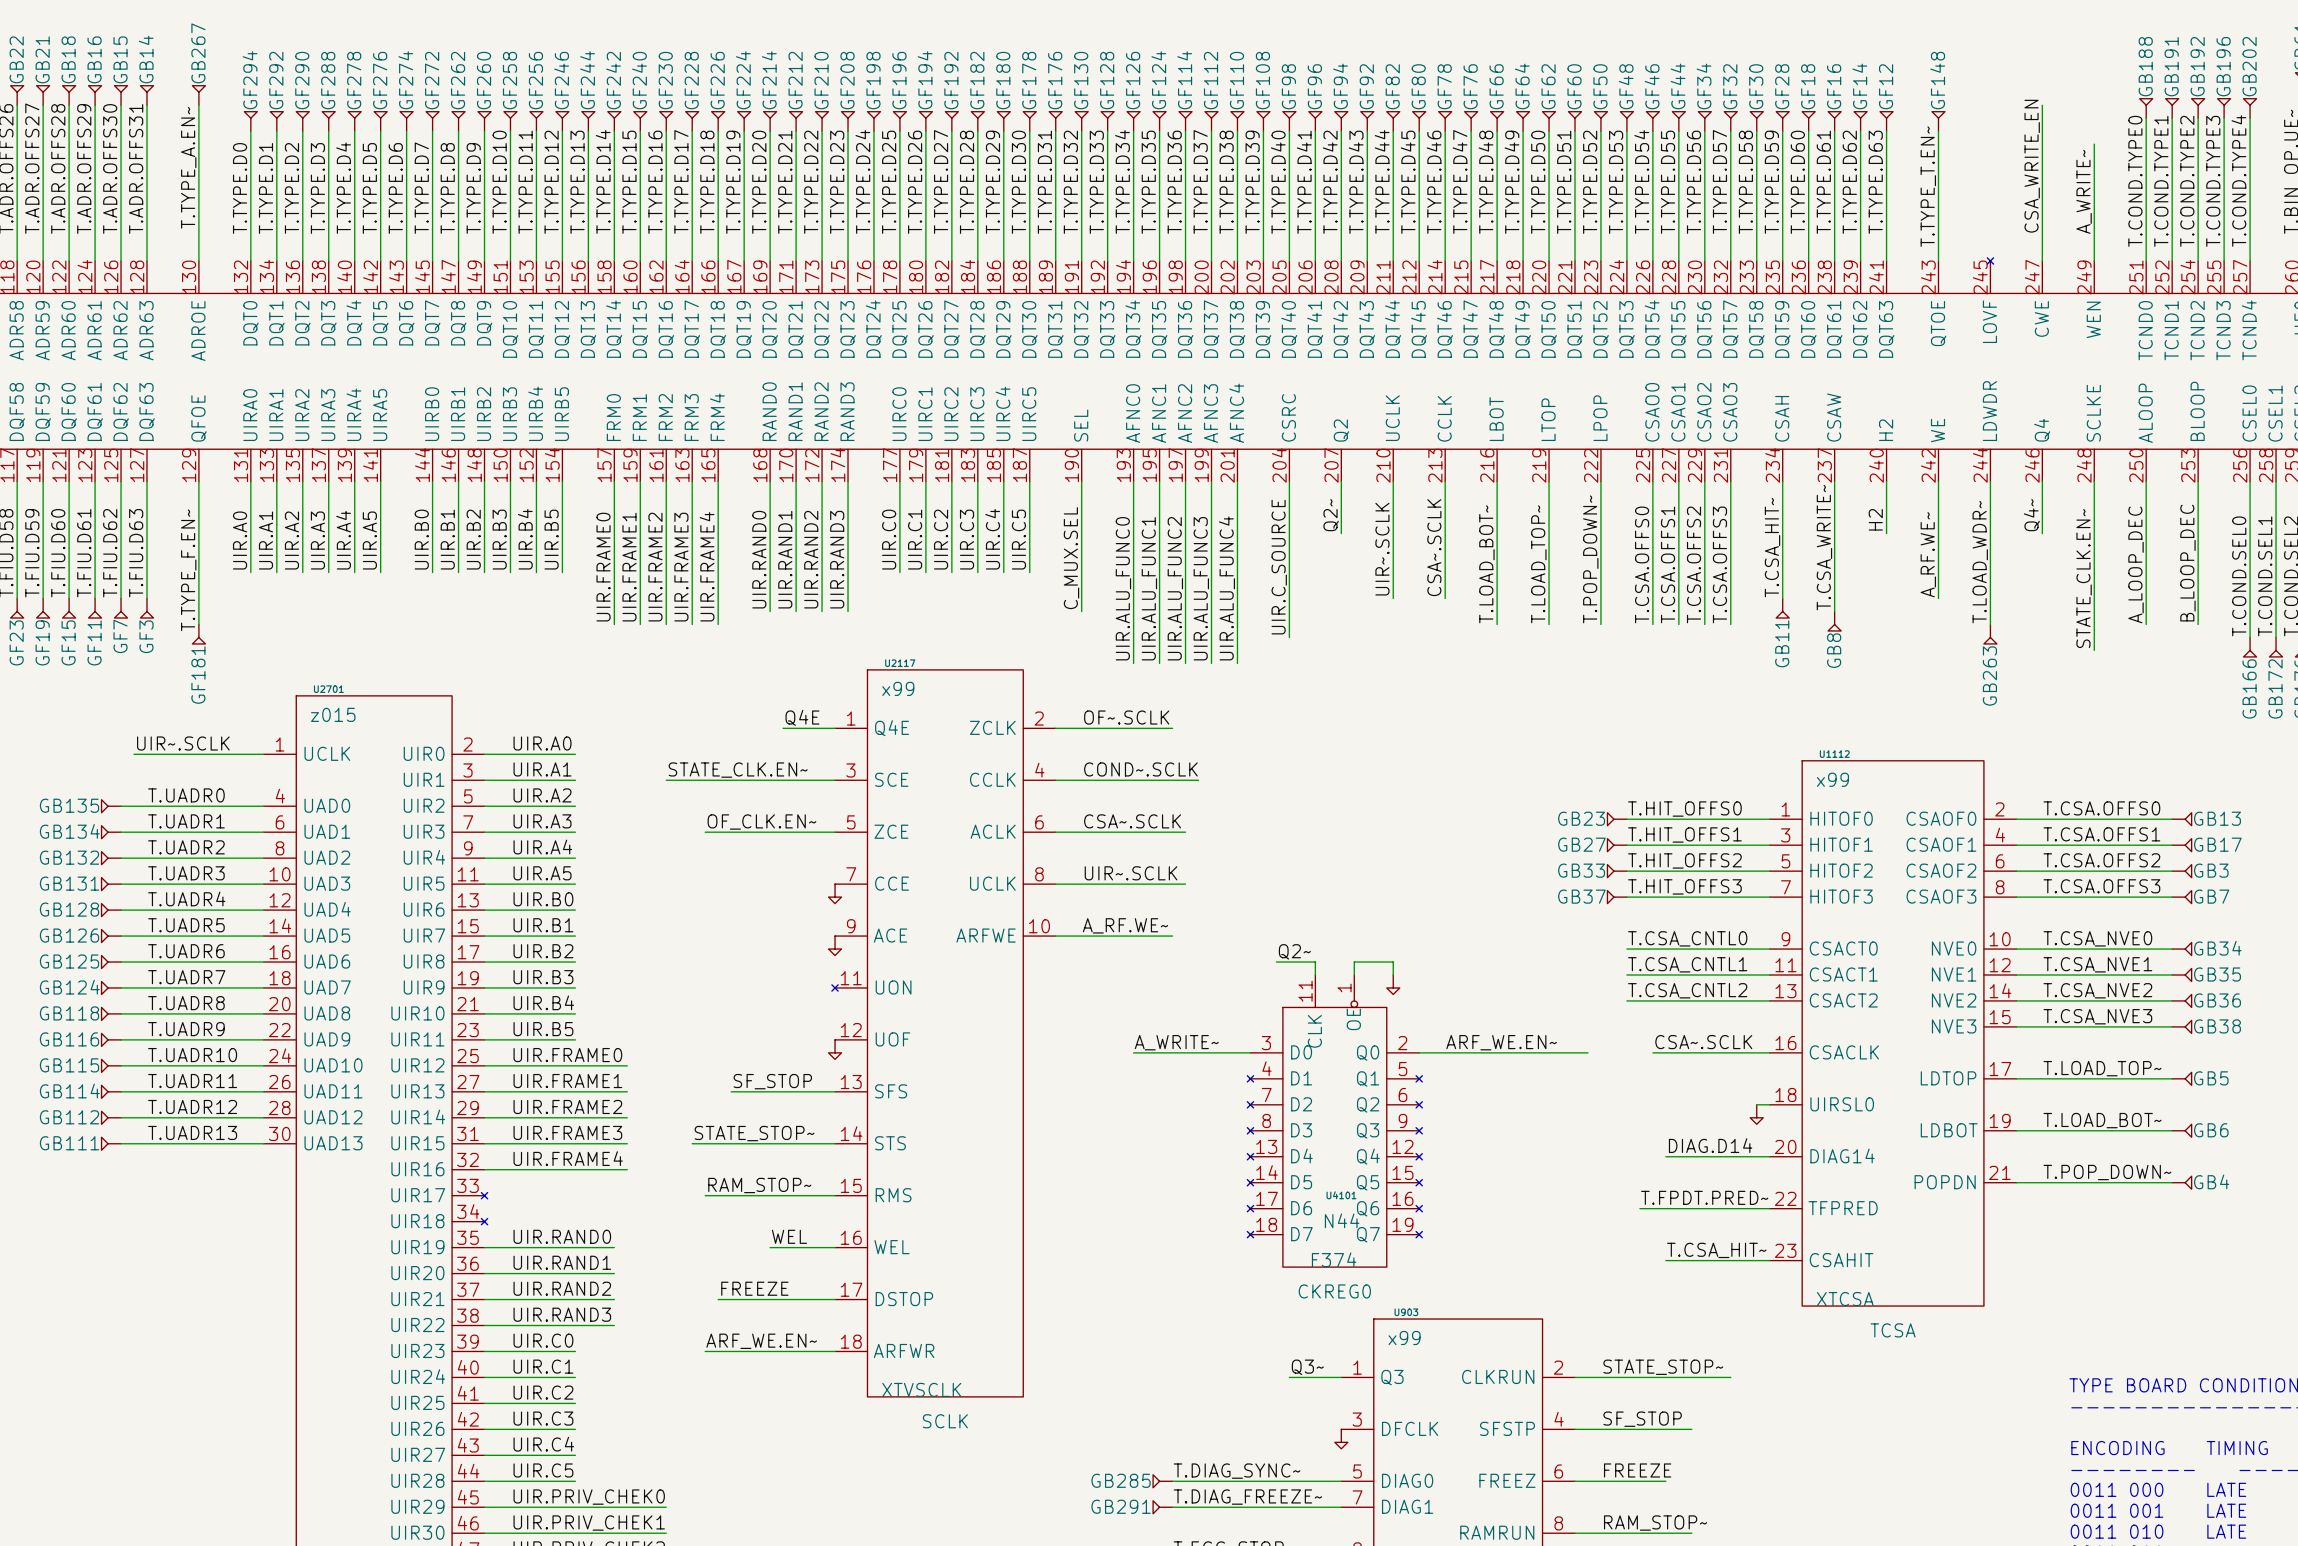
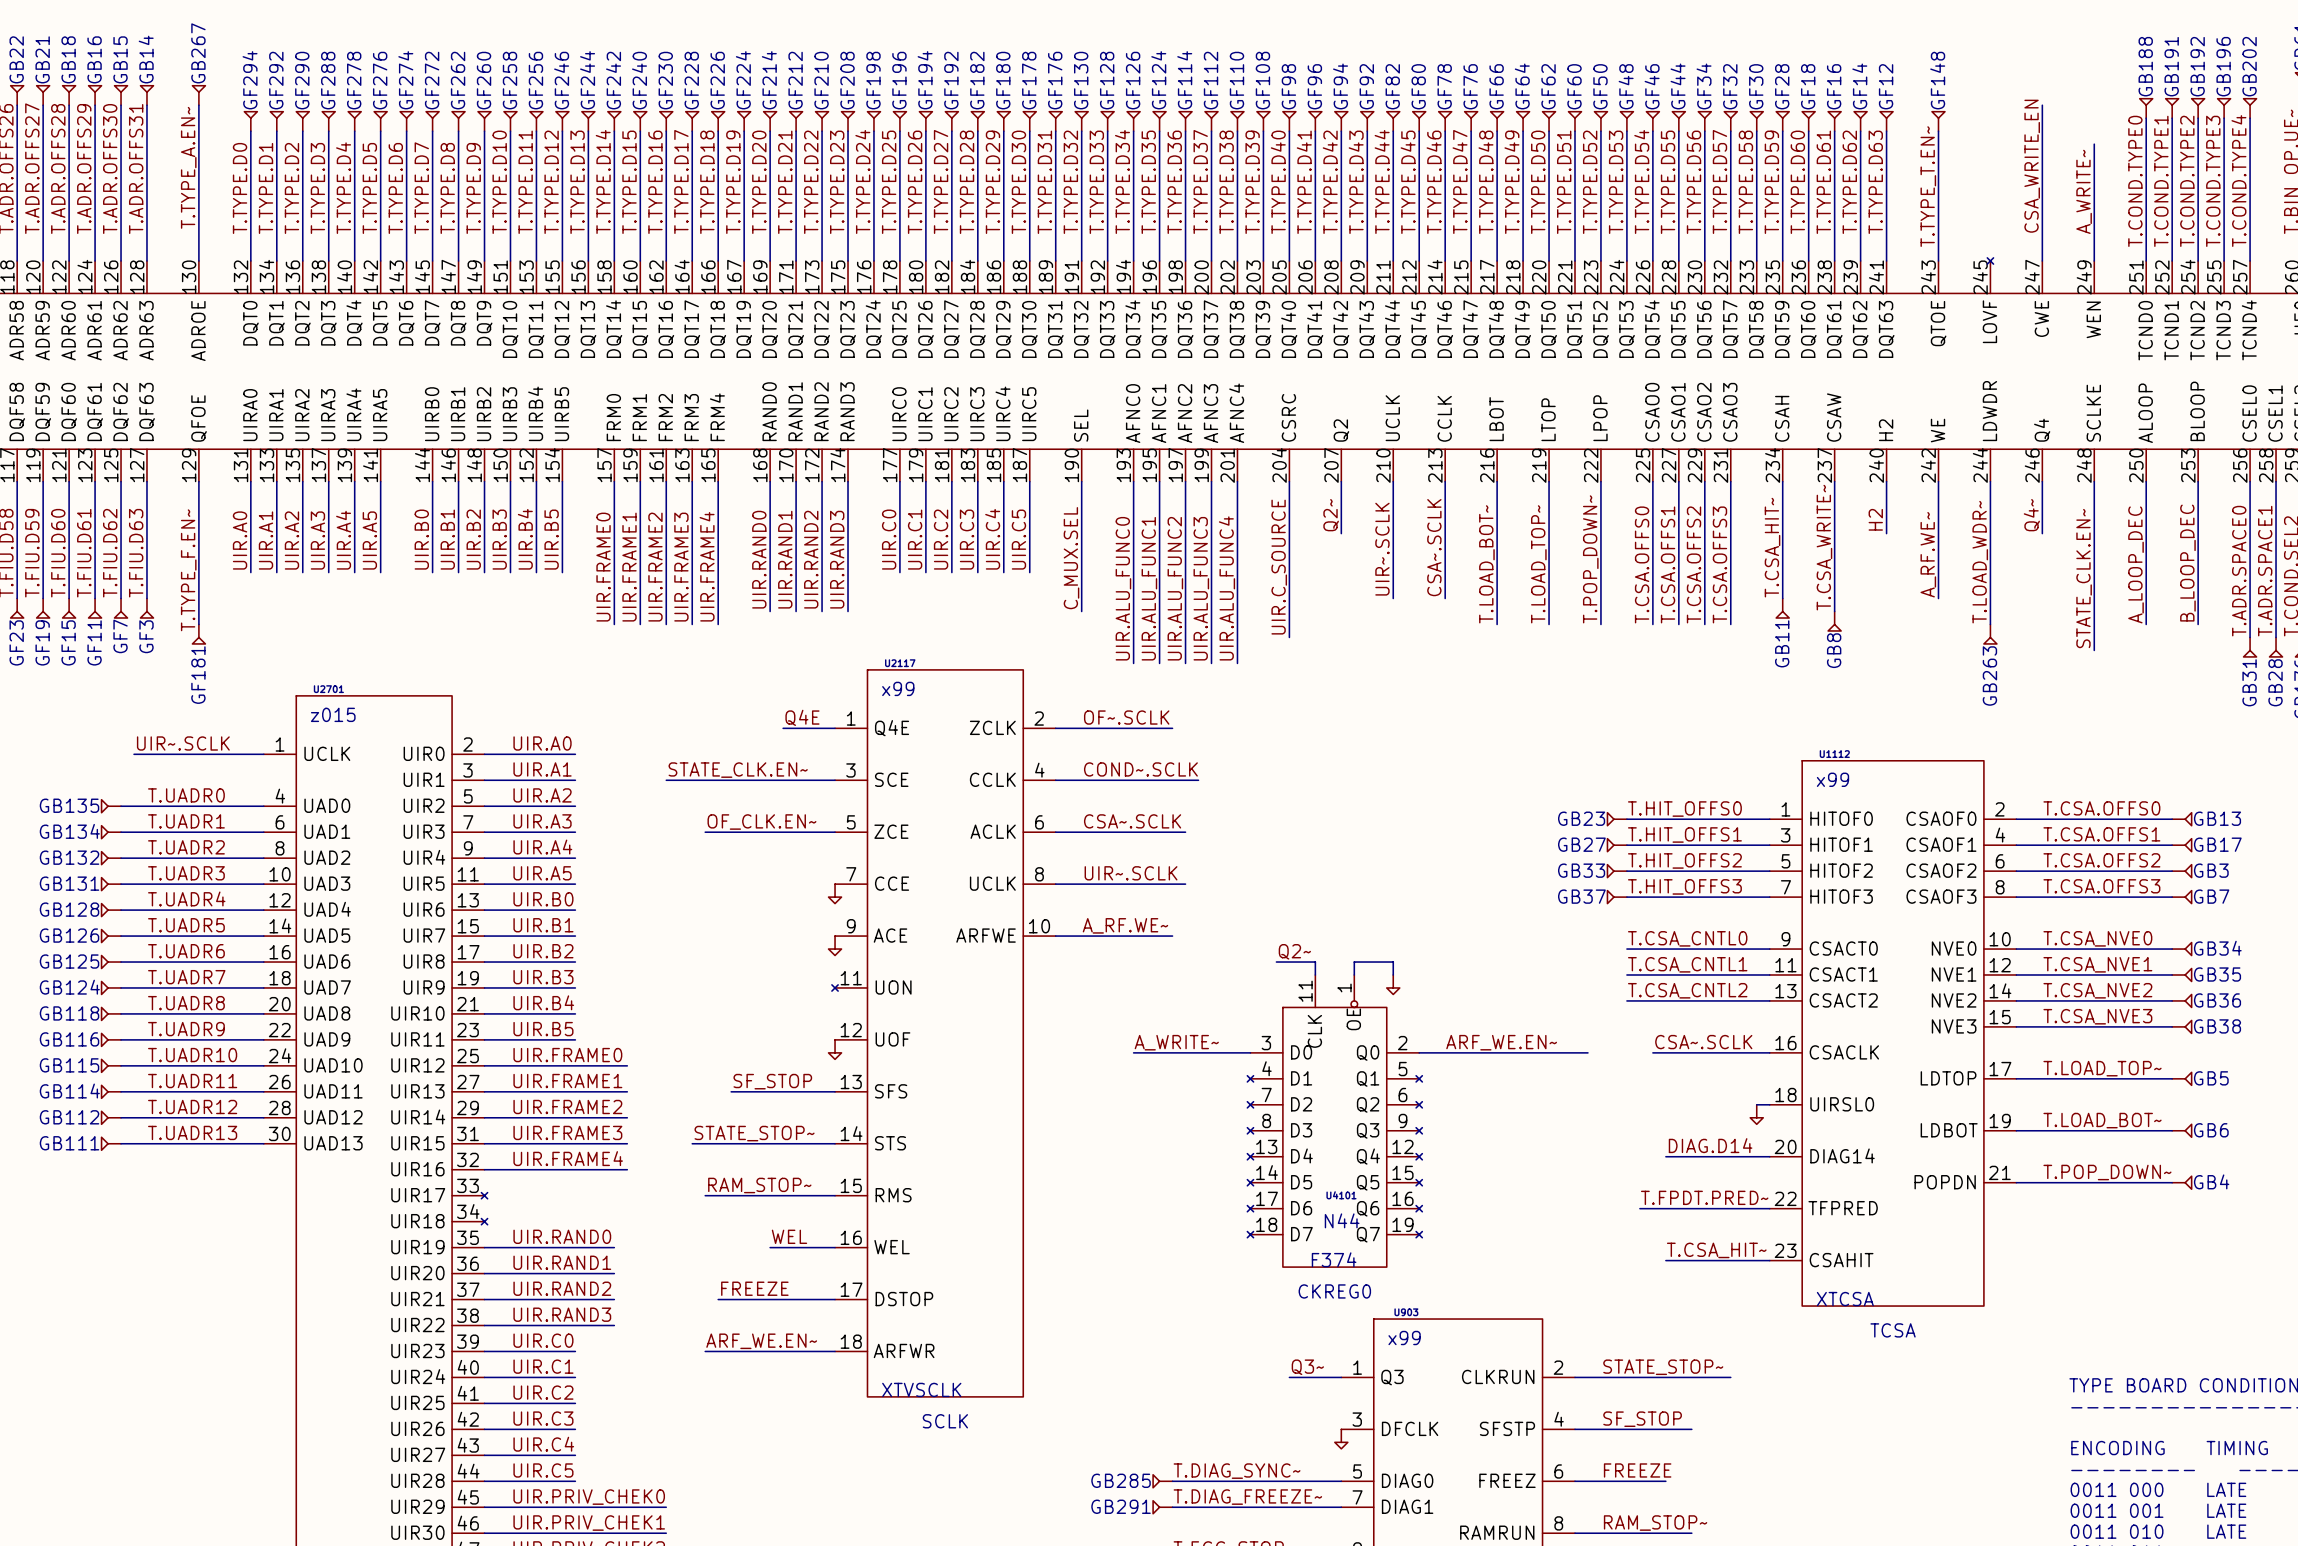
label: T.COND.SEL0 (2239, 576) -> T.ADR.SPACE0 (2239, 571)
label: T.COND.SEL1 (2265, 576) -> T.ADR.SPACE1 (2265, 571)
GB166 name: GB166 (2249, 688) -> GB31 (2249, 682)
GB172 name: GB172 (2275, 688) -> GB28 (2275, 682)

